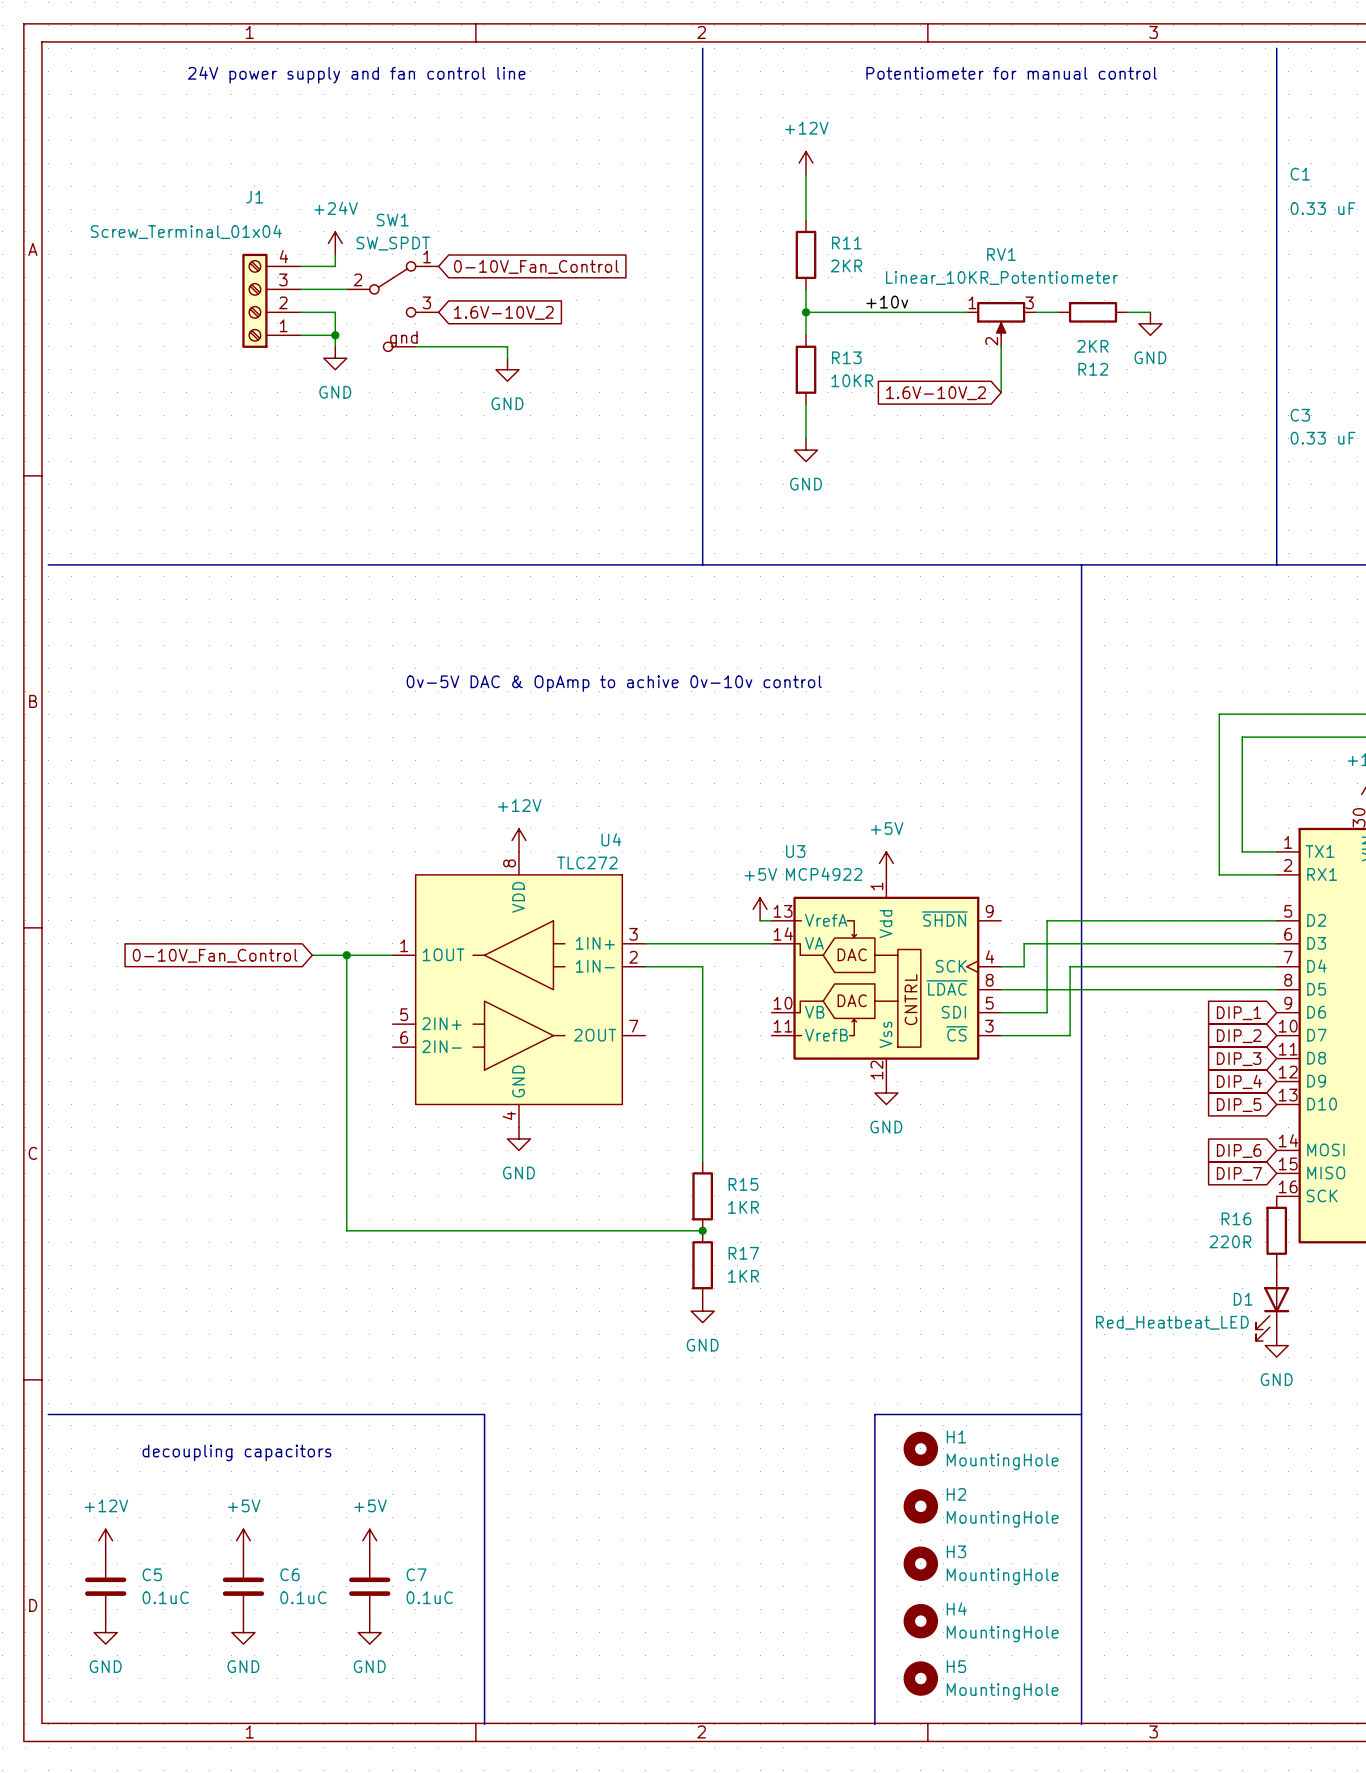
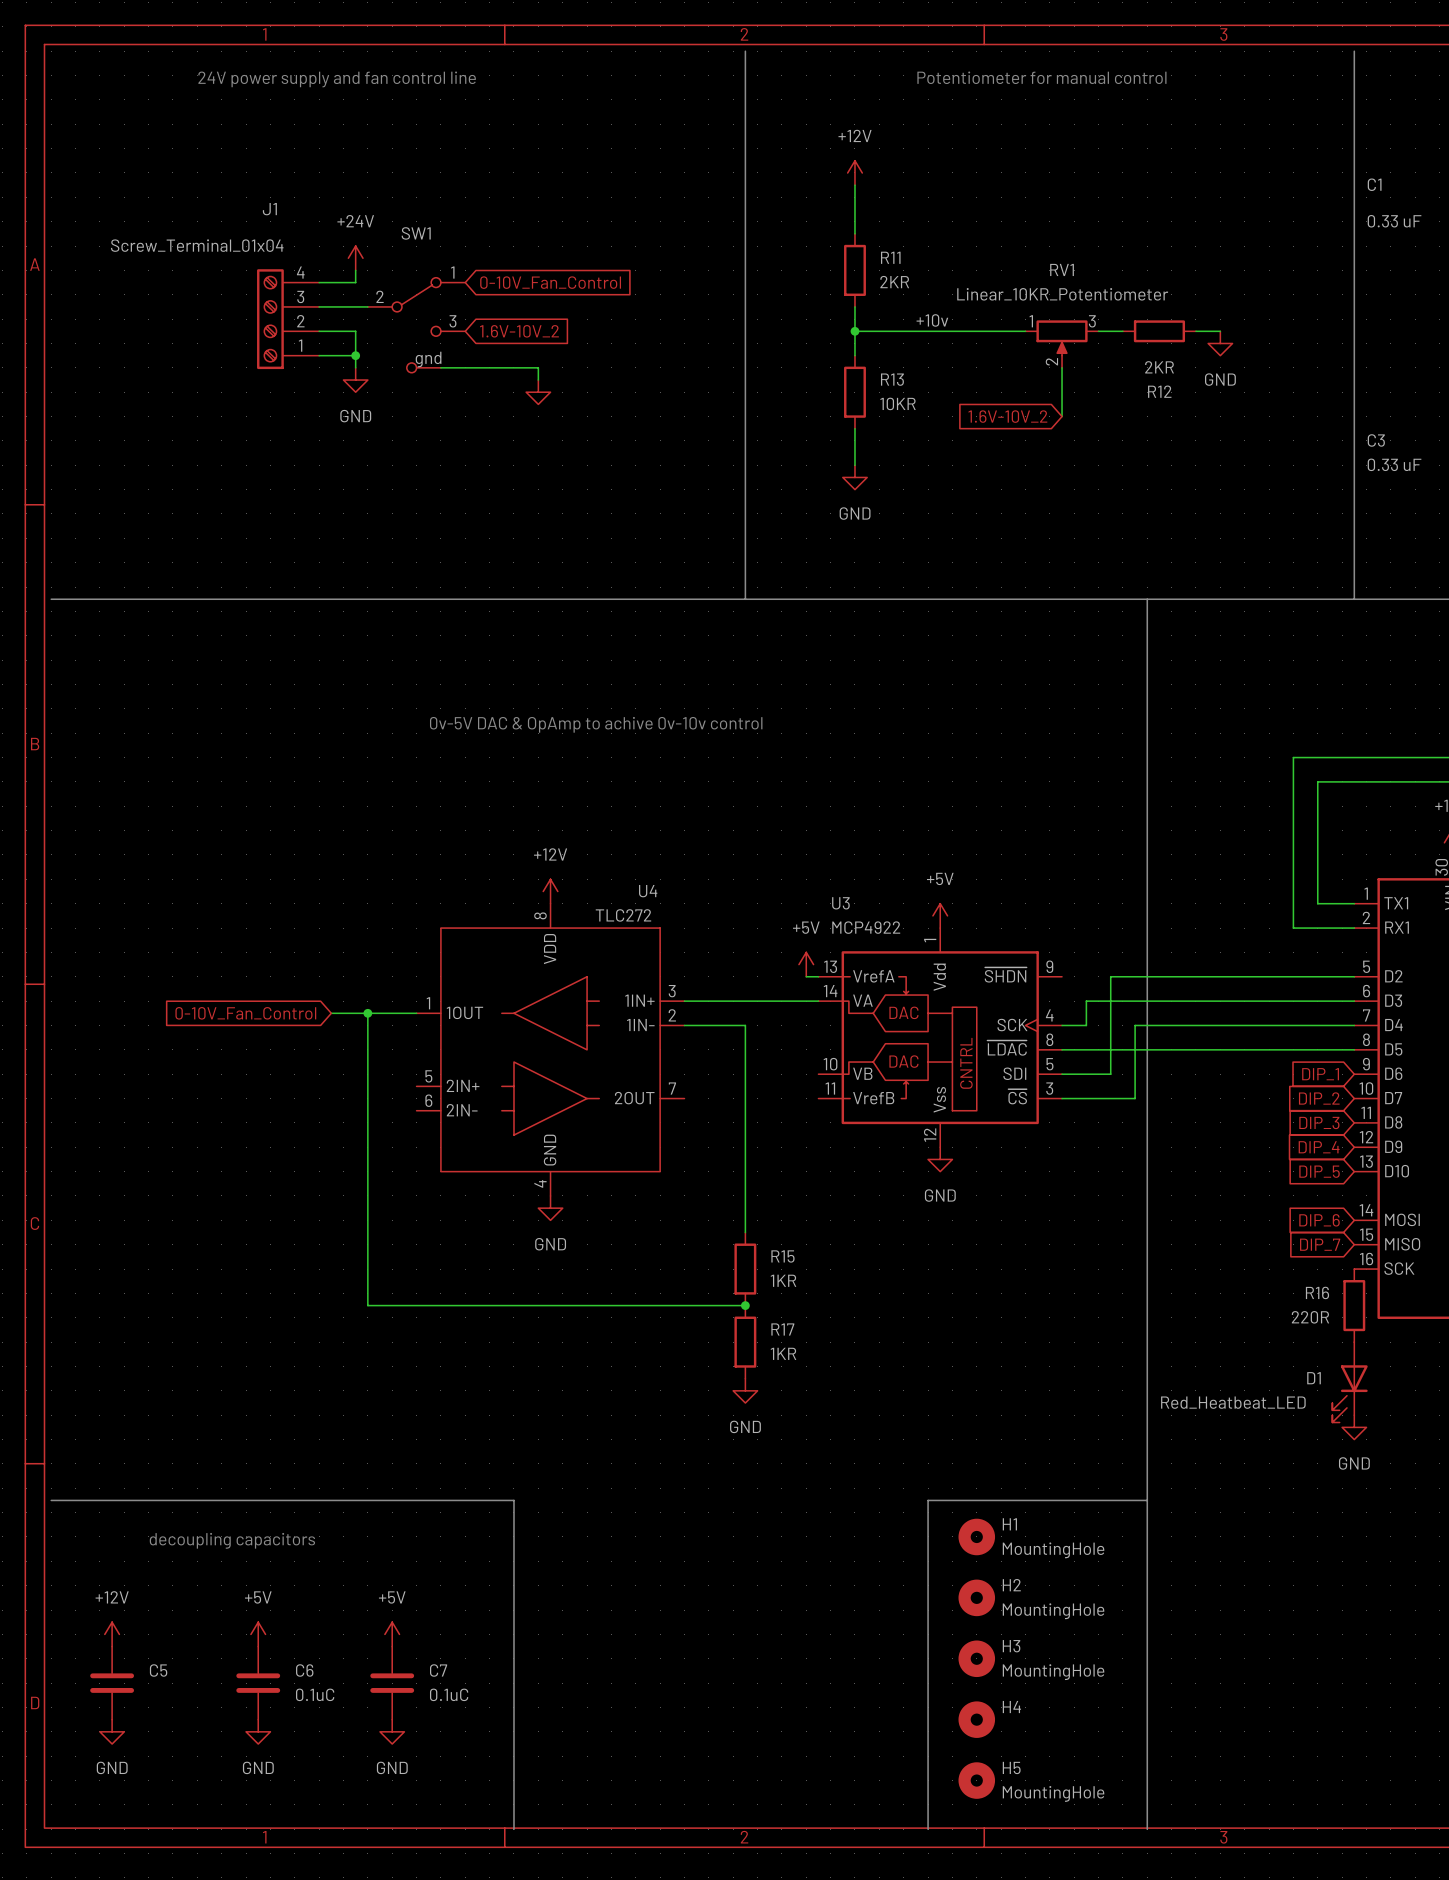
SW1 value: SW_SPDT (393, 243) -> none
power symbol text: GND (507, 403) -> none
C5 value: 0.1uC (165, 1597) -> none
H4 value: MountingHole (1002, 1634) -> none

